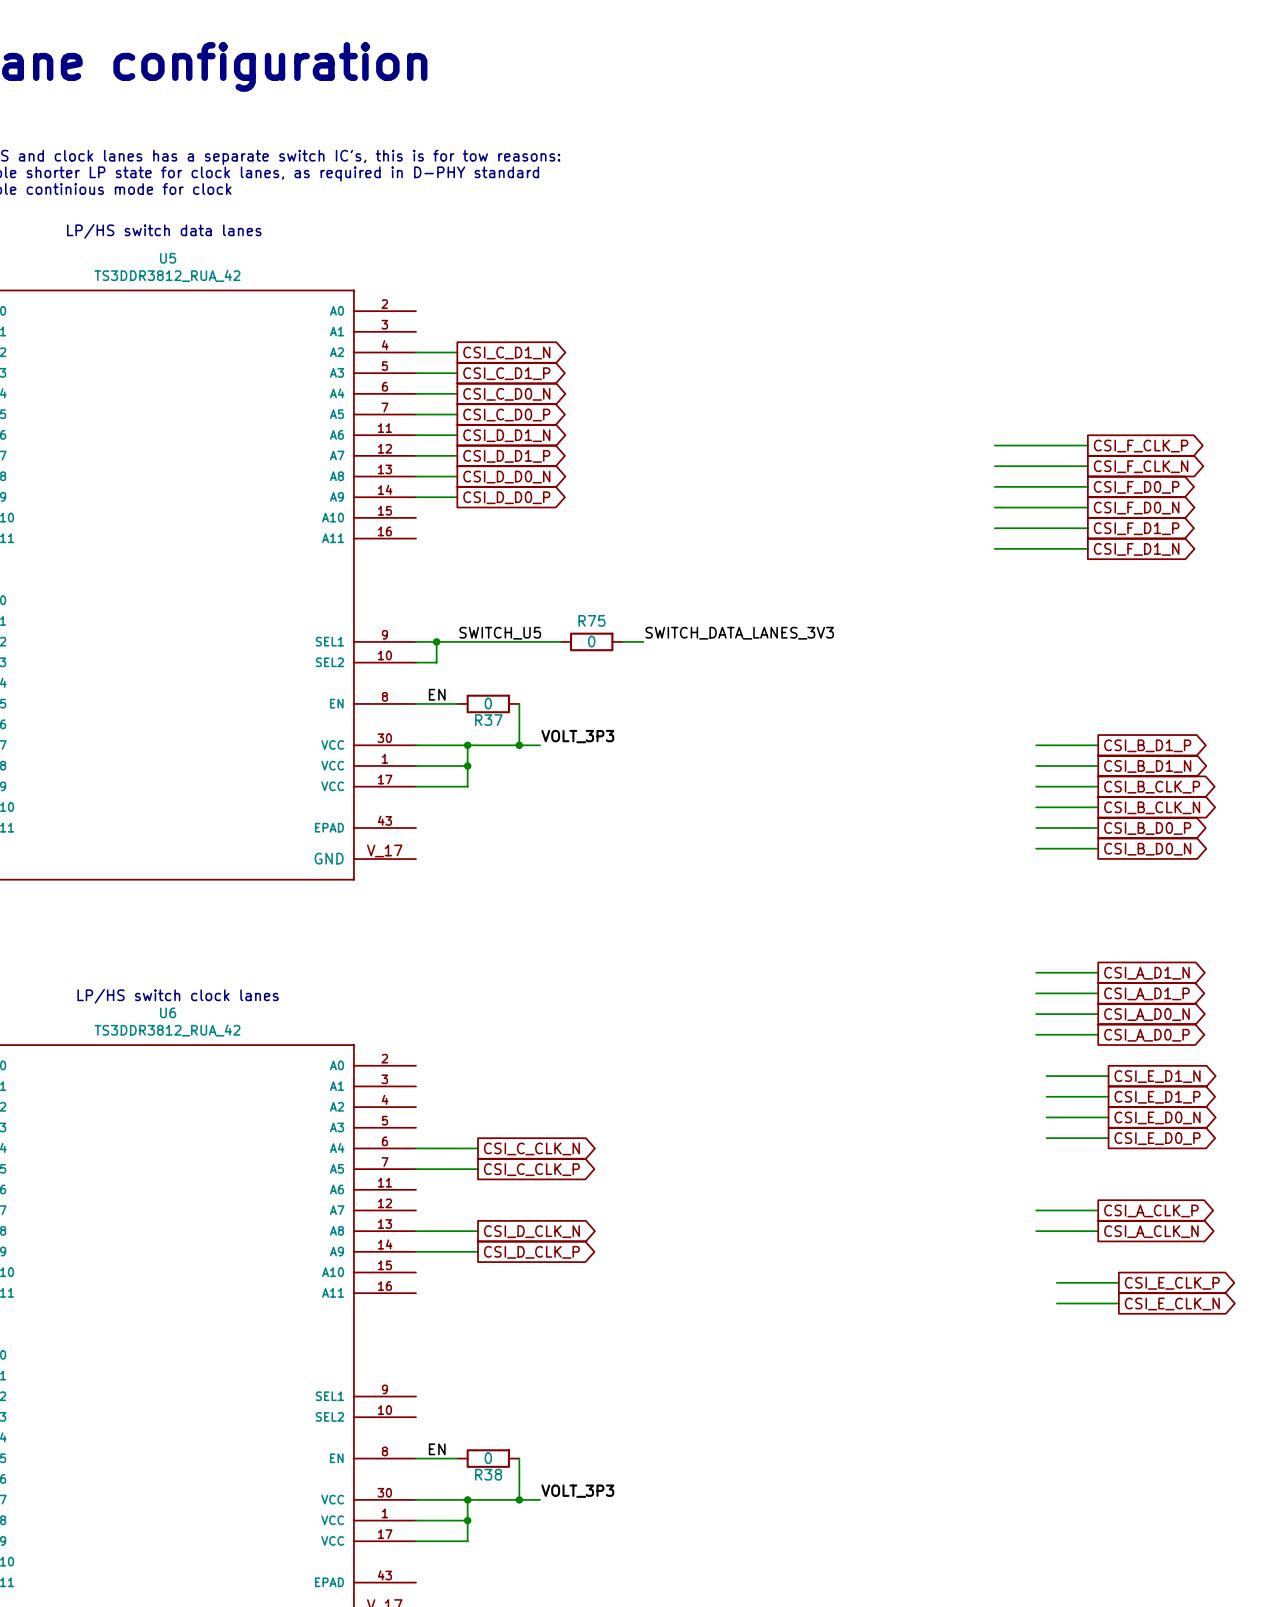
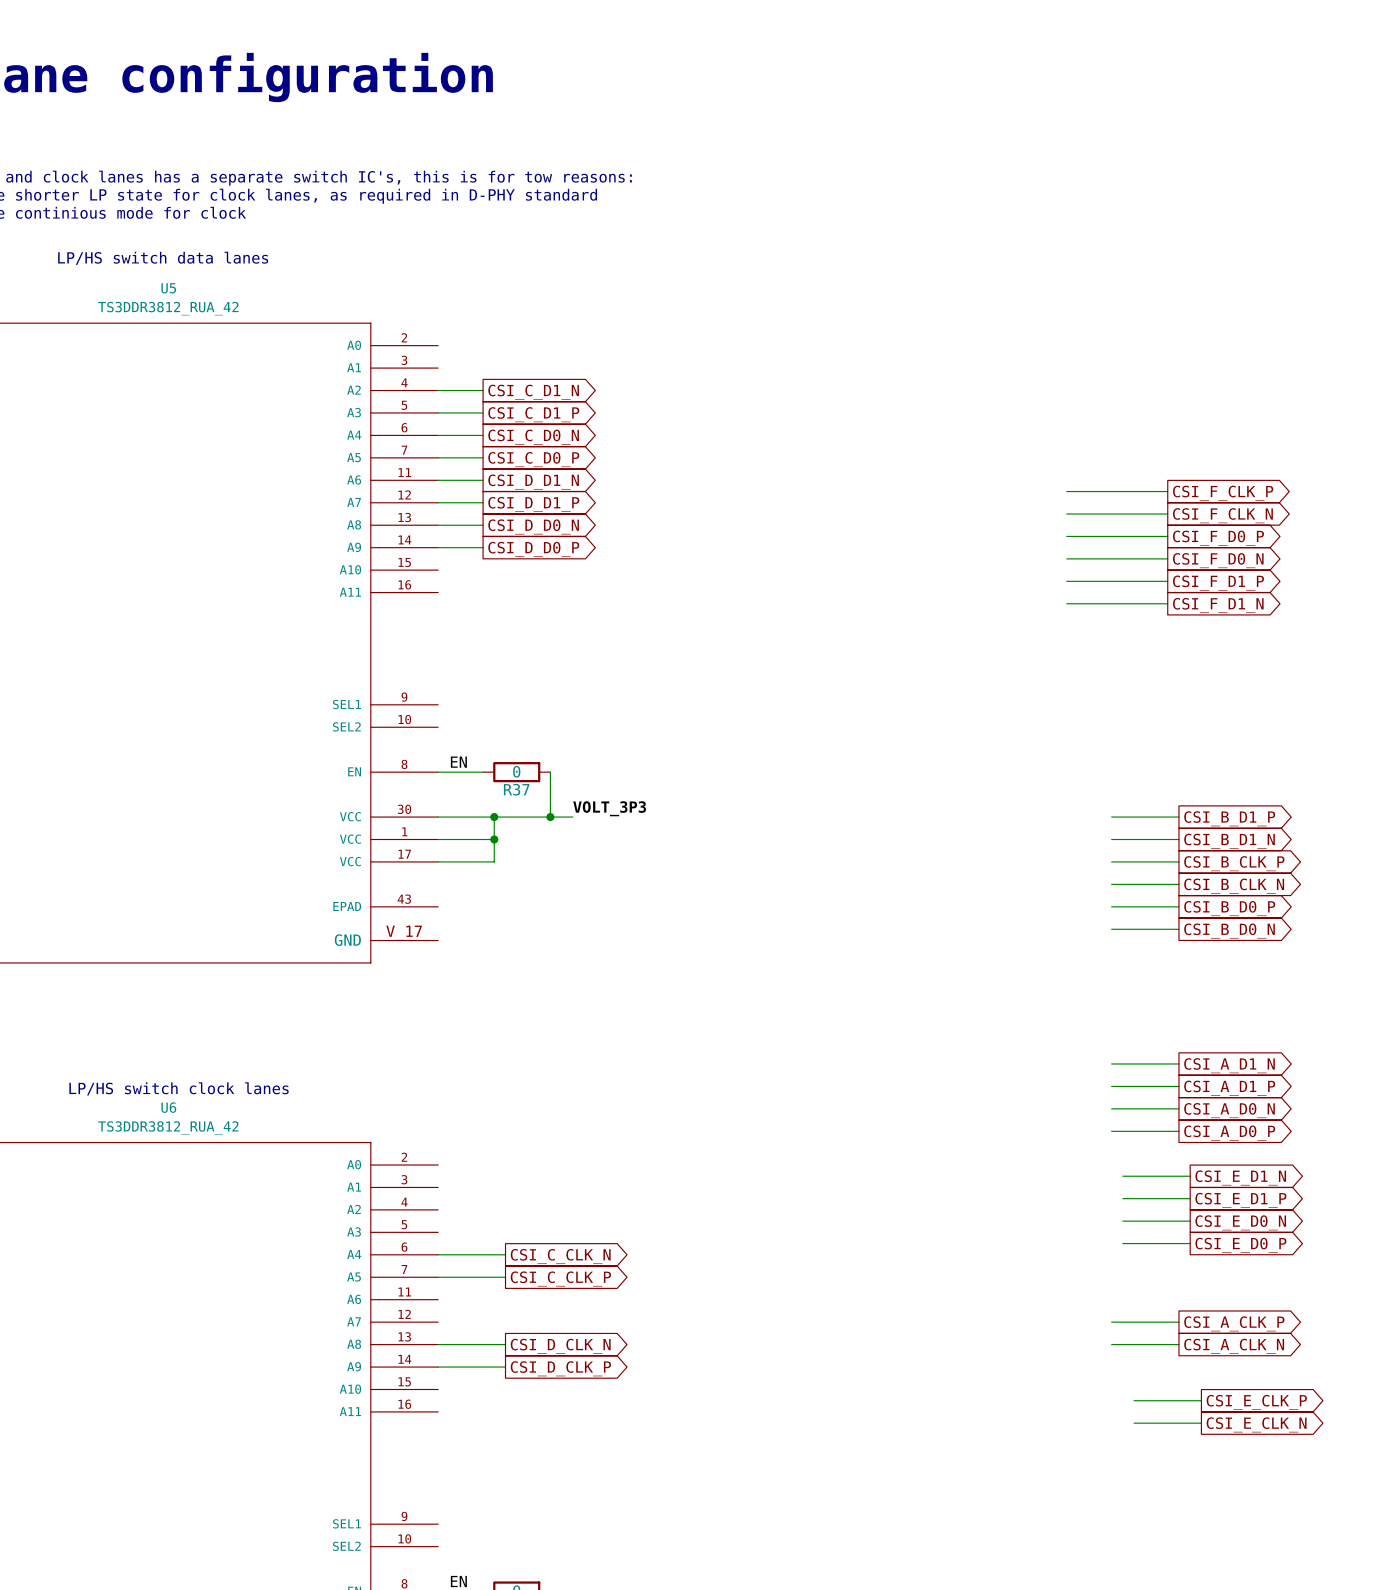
label: SWITCH_U5 (500, 633) -> none
label: SWITCH_DATA_LANES_3V3 (739, 633) -> none
wire: (415, 641) (560, 641) -> none
wire: (436, 641) (436, 662) (415, 662) -> none
junction: (436, 641) -> none
R75: 0 (591, 641) -> none
wire: (622, 641) (643, 641) -> none

